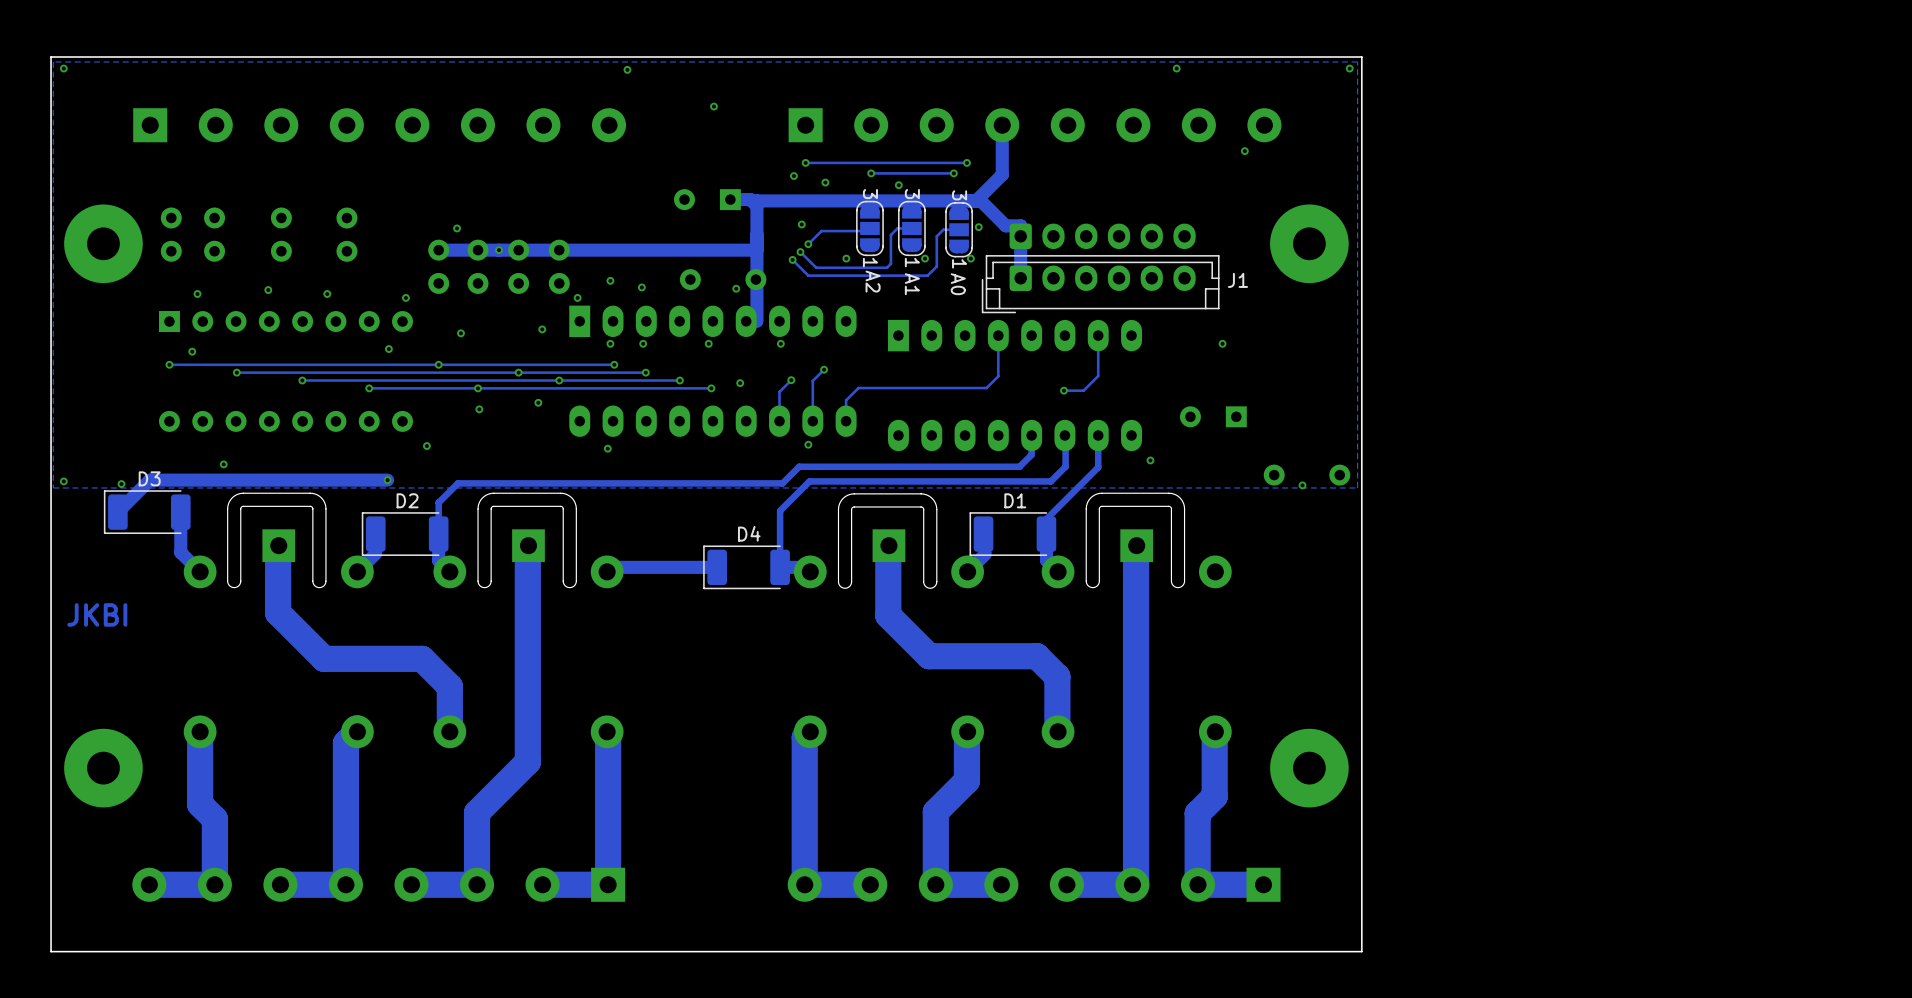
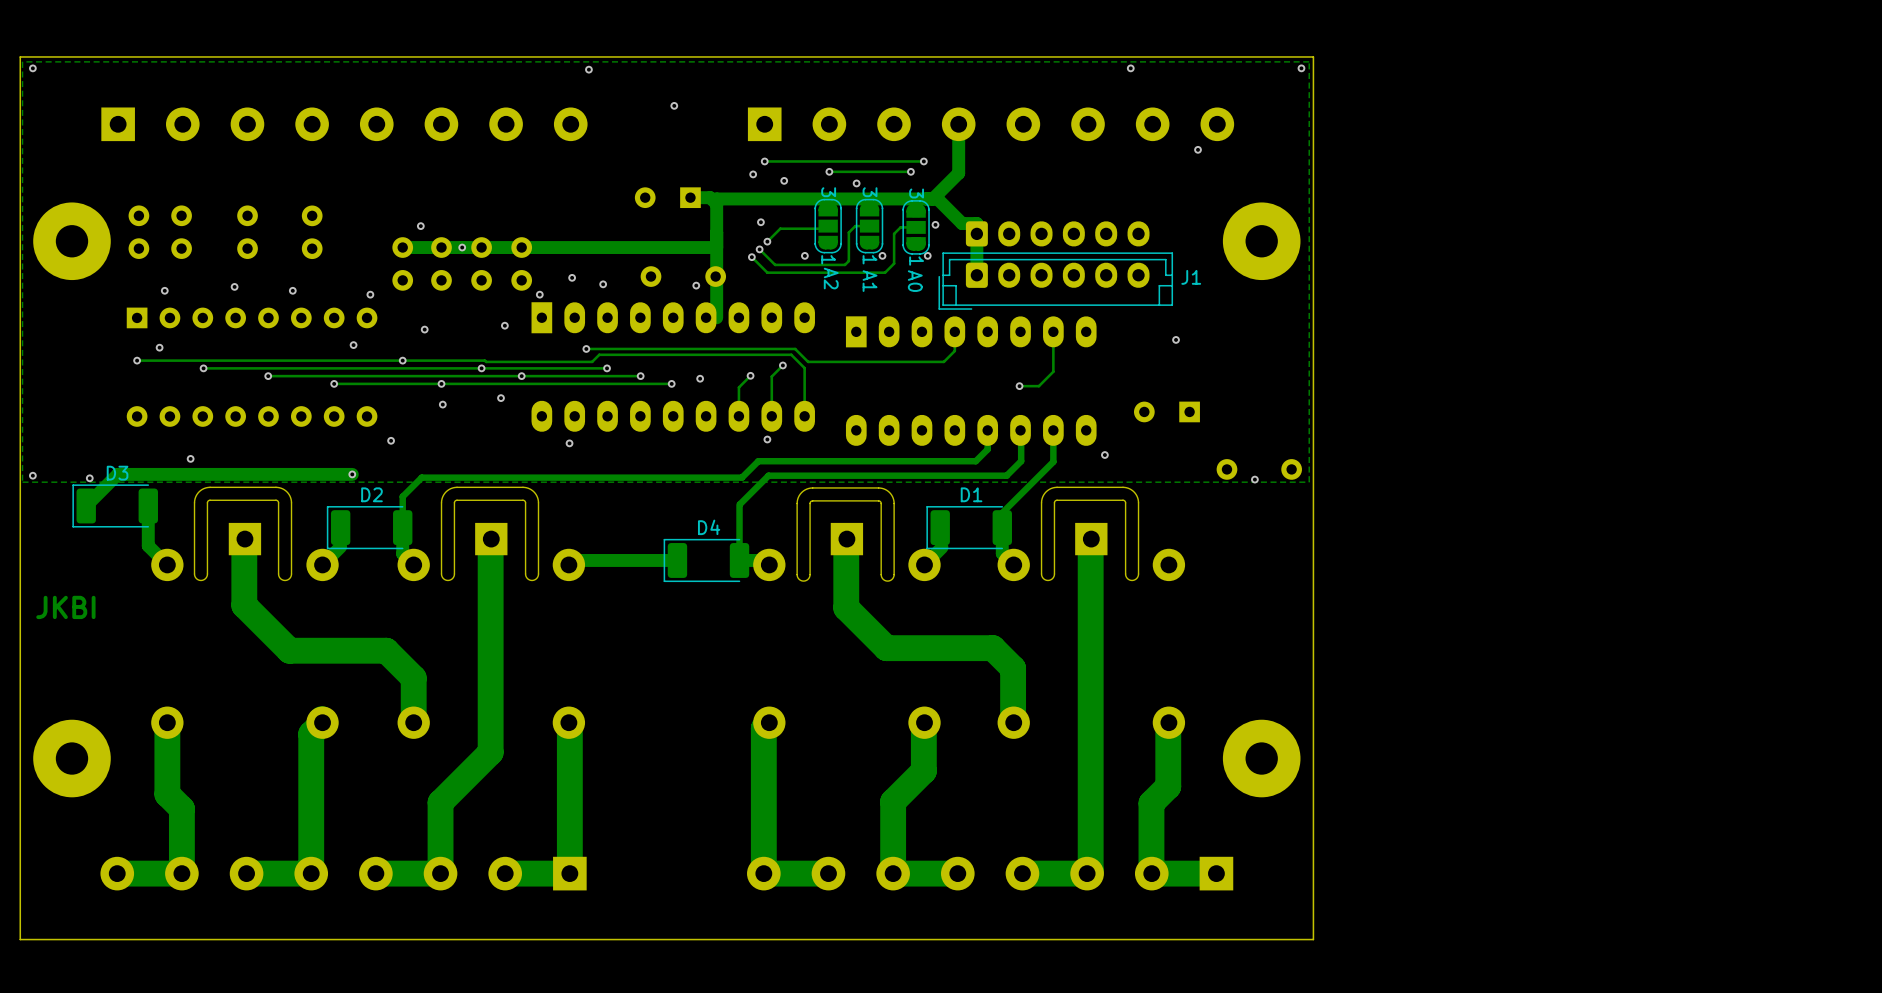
via: (610, 343) -> none
via: (643, 343) -> none
via: (708, 343) -> none
via: (780, 343) -> none
via: none -> (586, 348)
track: (998, 355) (998, 376) (986, 388) (858, 388) (846, 400) -> (954, 350) (943, 361) (808, 361) (795, 348) (586, 348)
track: (614, 364) (521, 364) -> (804, 395) (804, 368) (791, 354) (599, 354) (592, 361) (484, 360)
via: (614, 364) -> none

